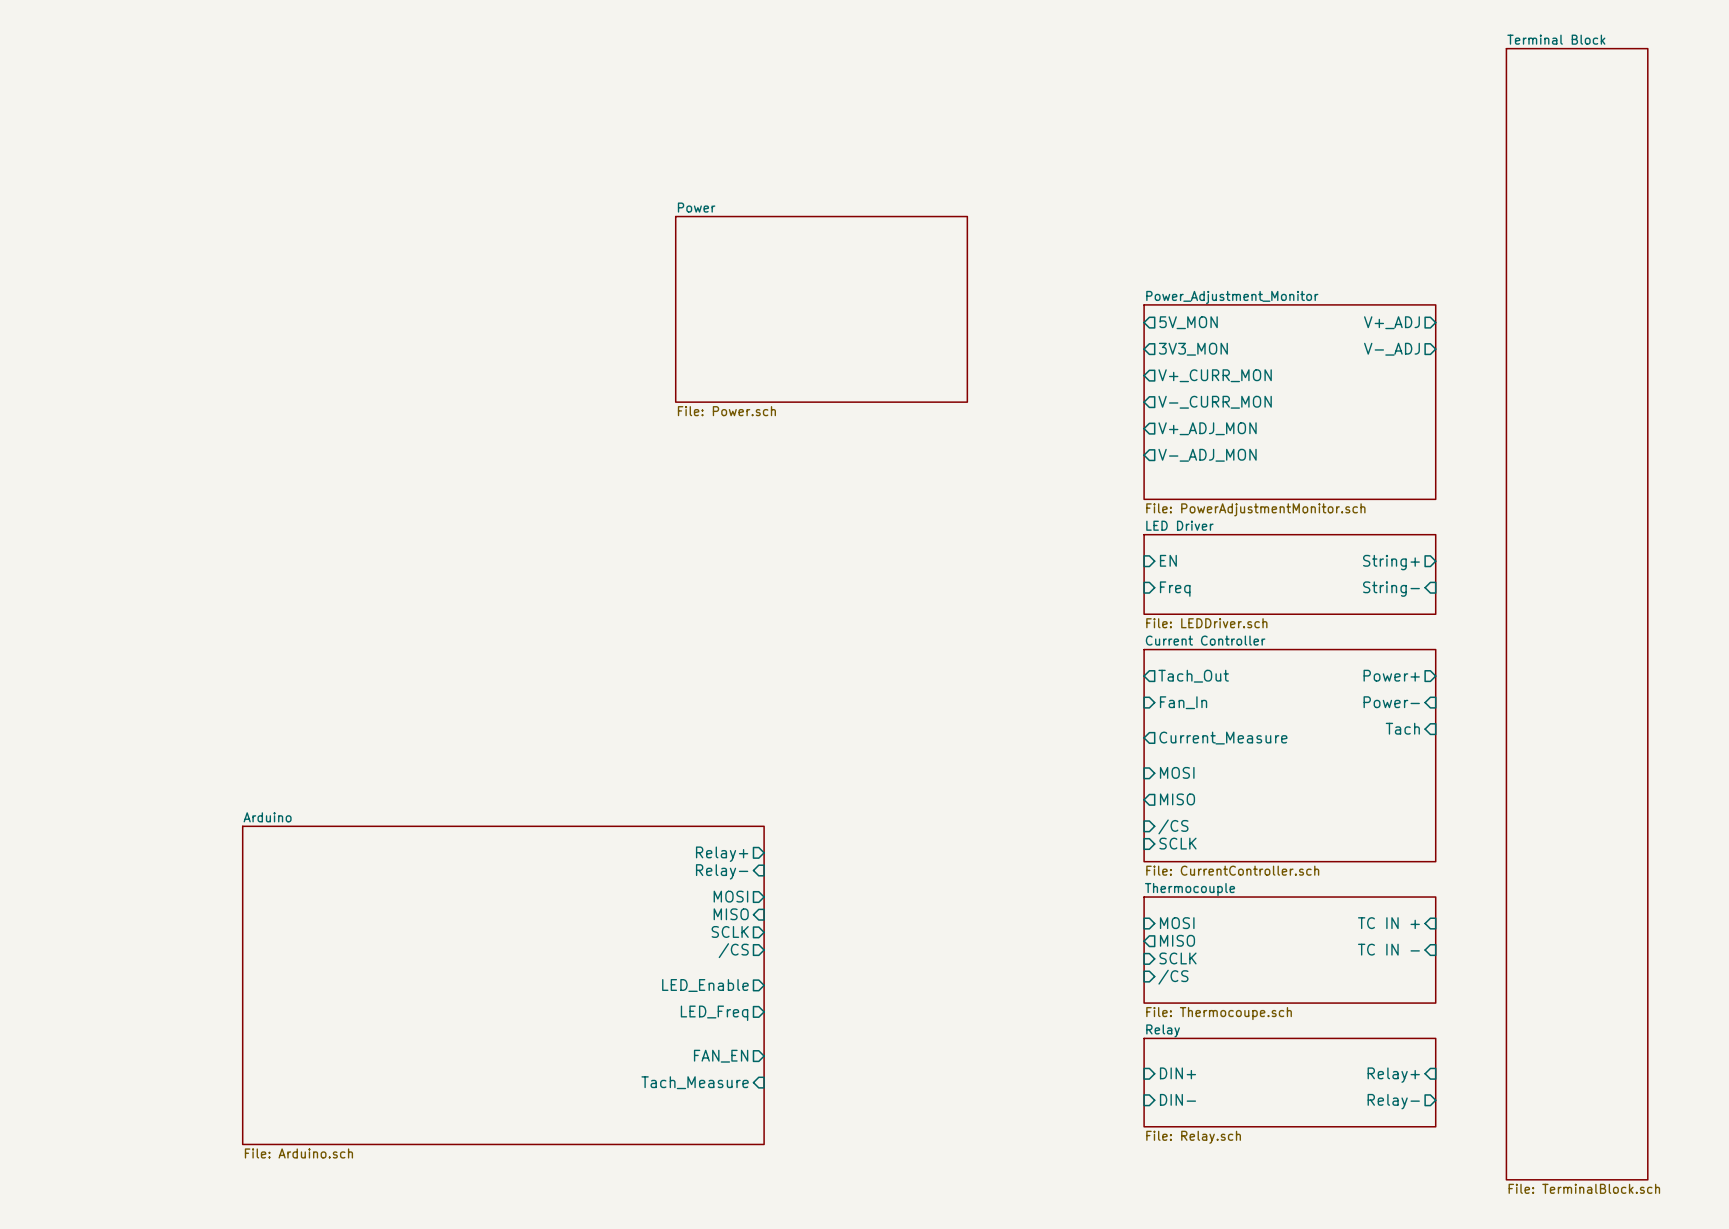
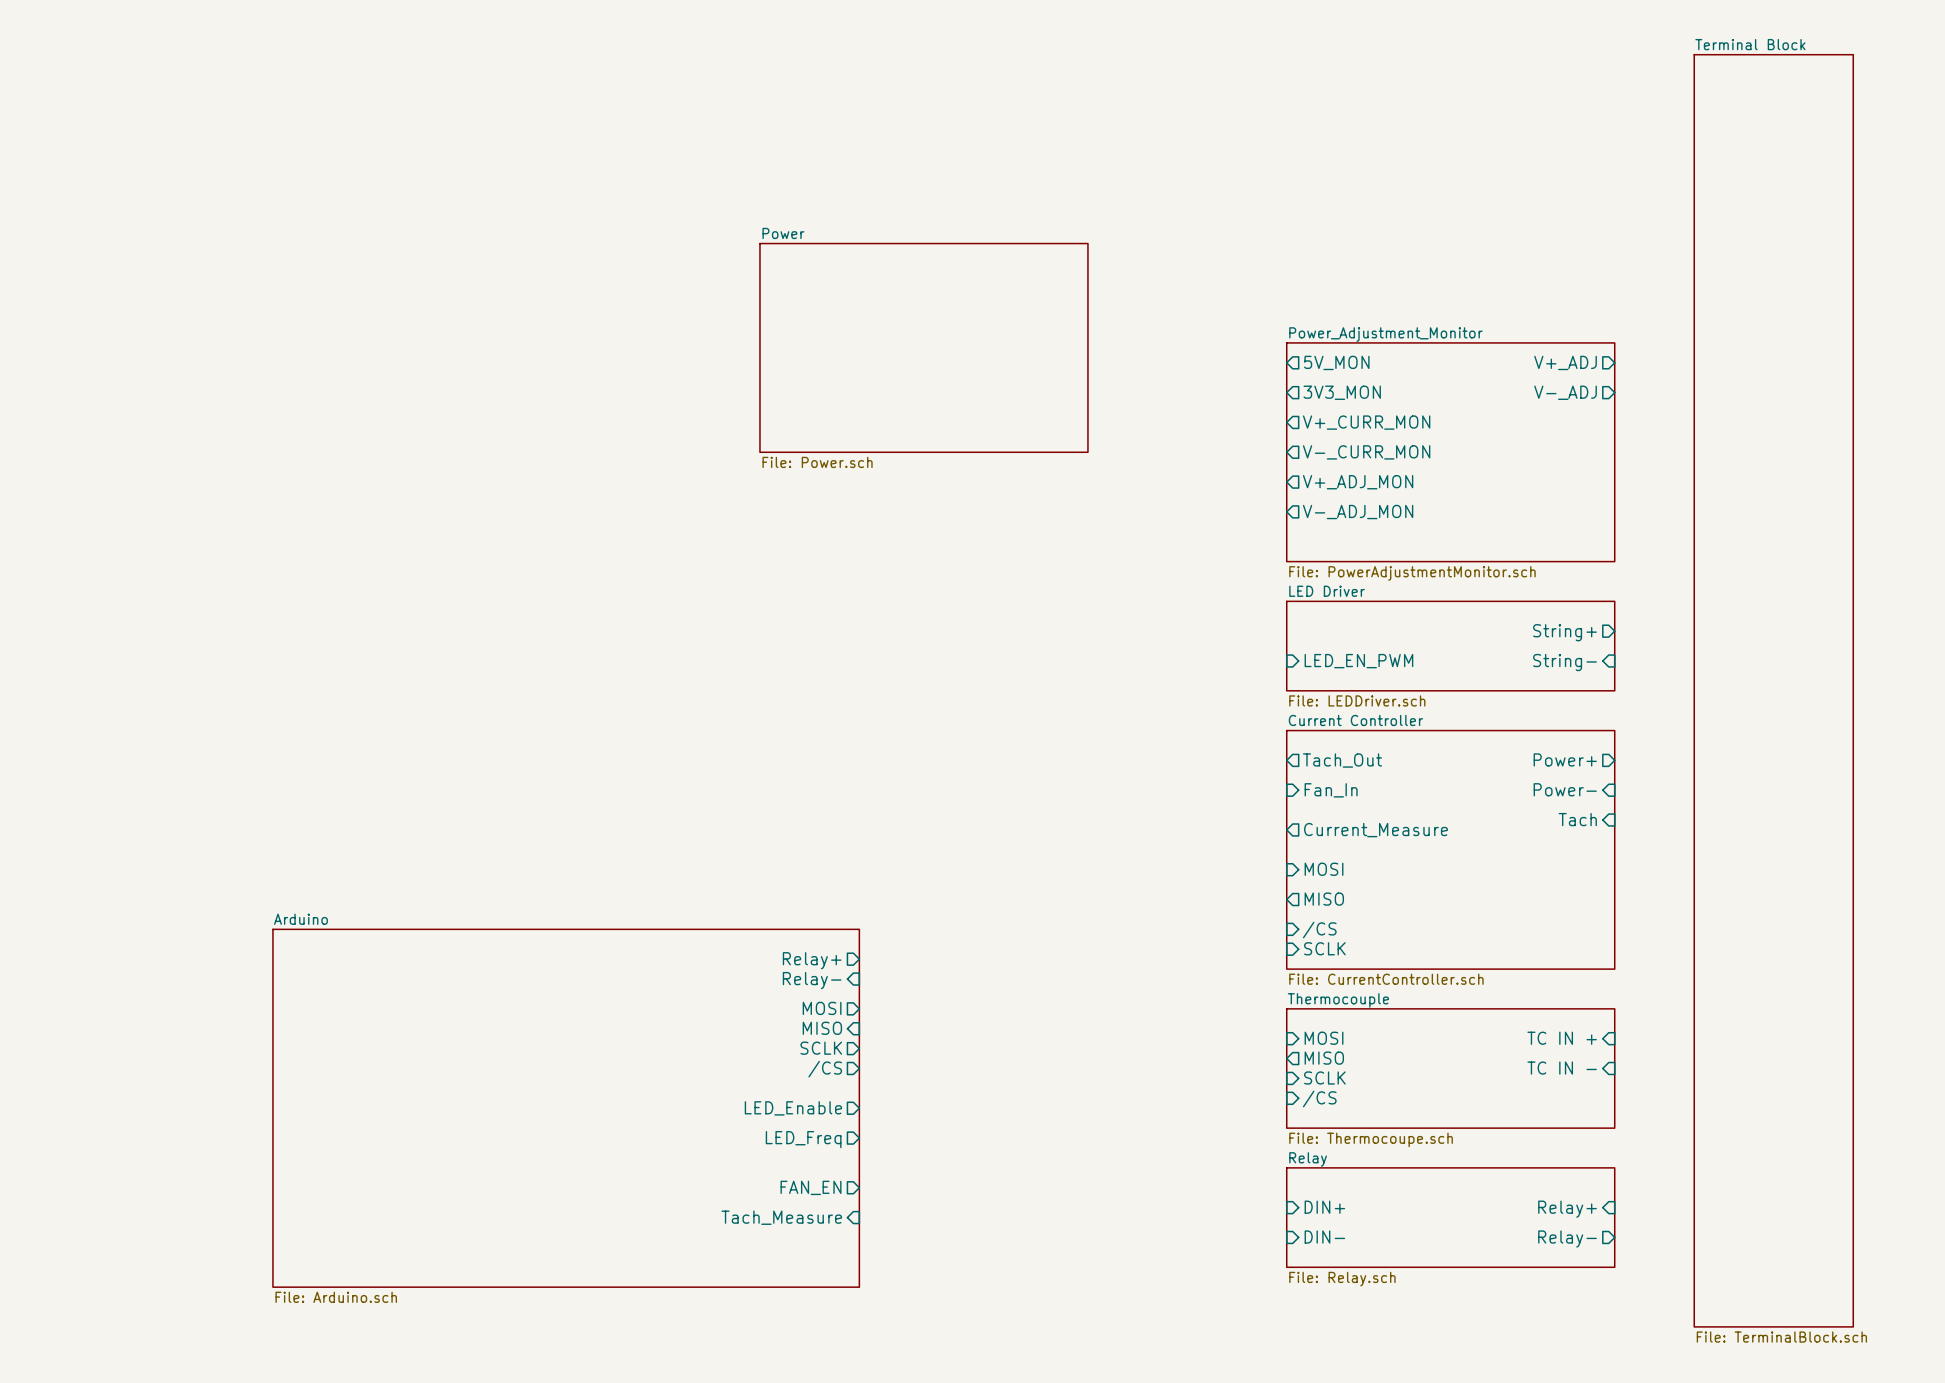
sheet pin: EN (1168, 560) -> none
sheet pin: Freq (1175, 589) -> LED_EN_PWM (1358, 661)

